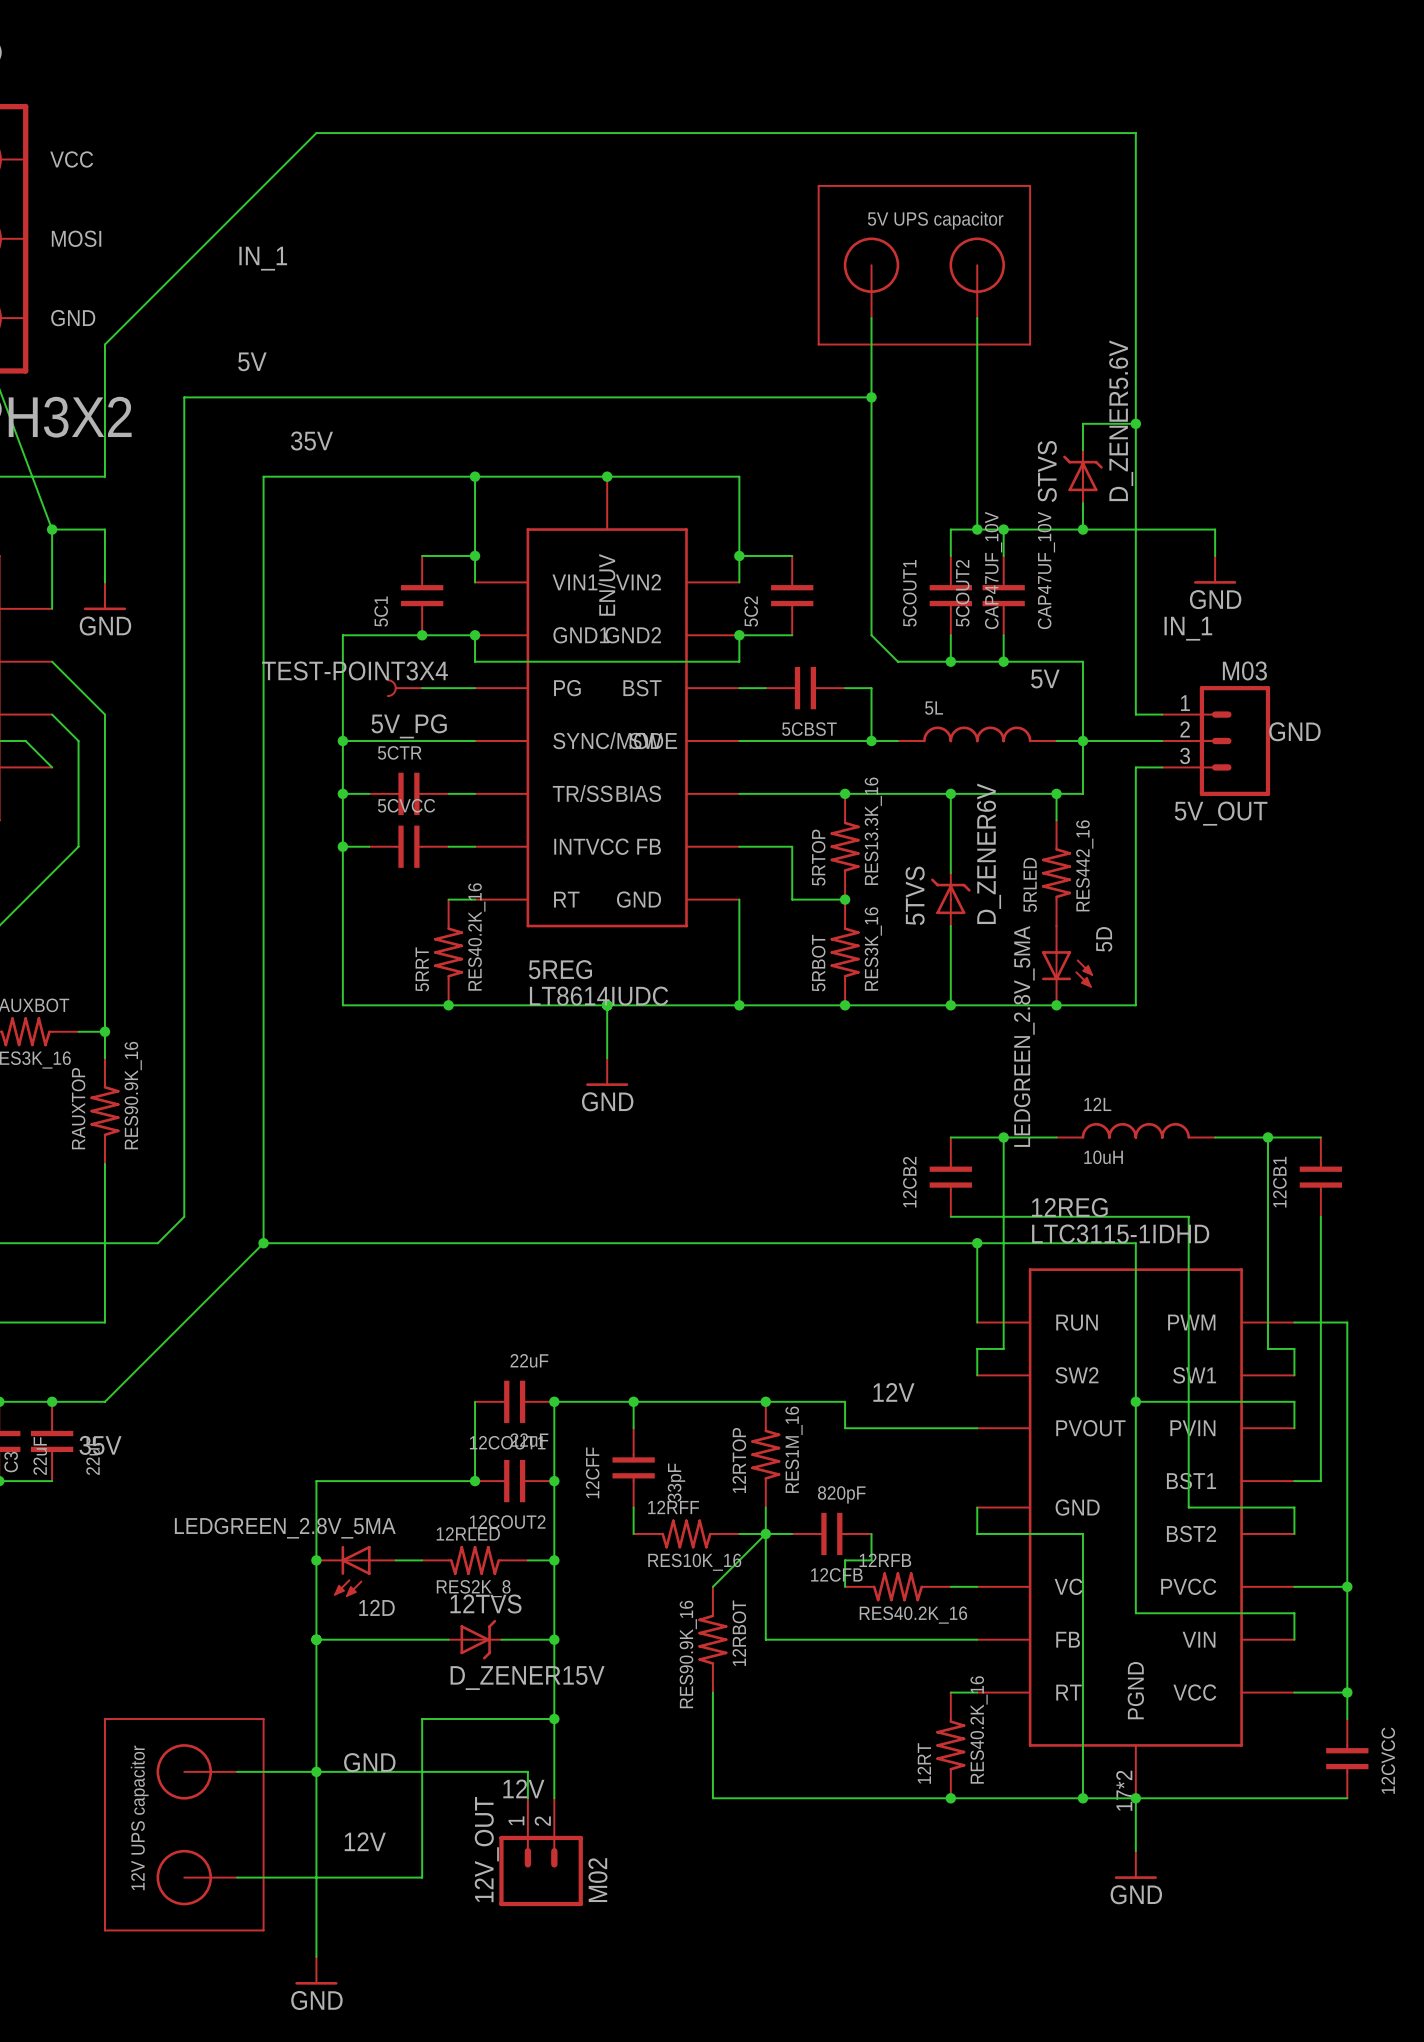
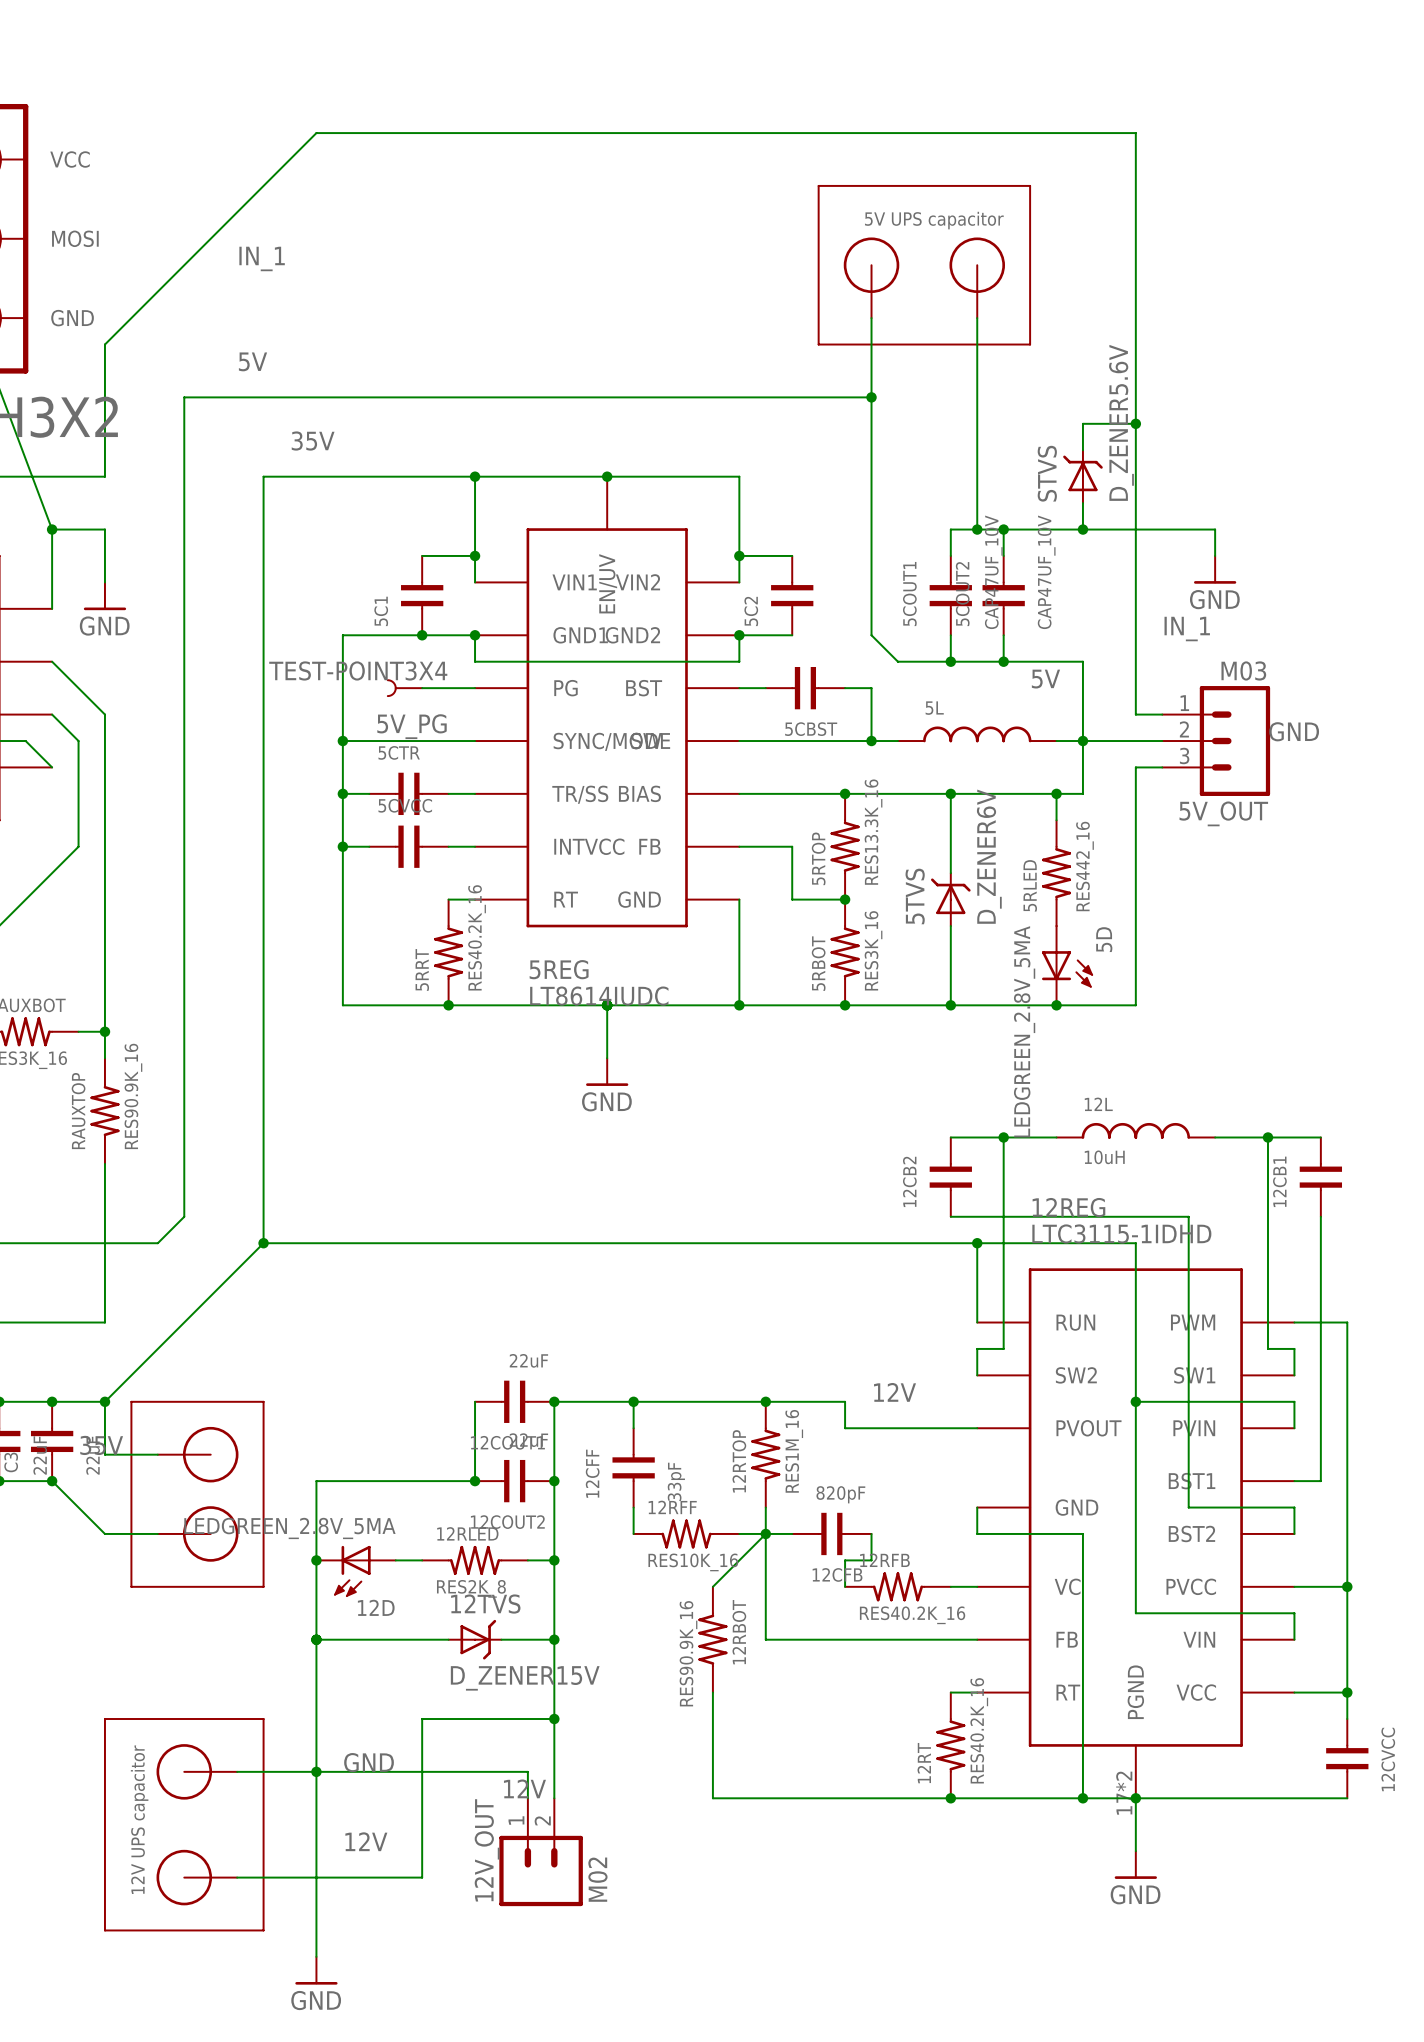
wire: none -> (104, 1401) (104, 1454) (157, 1454)
junction: none -> (104, 1401)
line: none -> (131, 1401) (263, 1401) (263, 1586) (131, 1586) (131, 1401)
part: none -> (198, 1454)
wire: none -> (52, 1481) (104, 1533) (157, 1533)
junction: none -> (52, 1481)
part: none -> (198, 1533)

